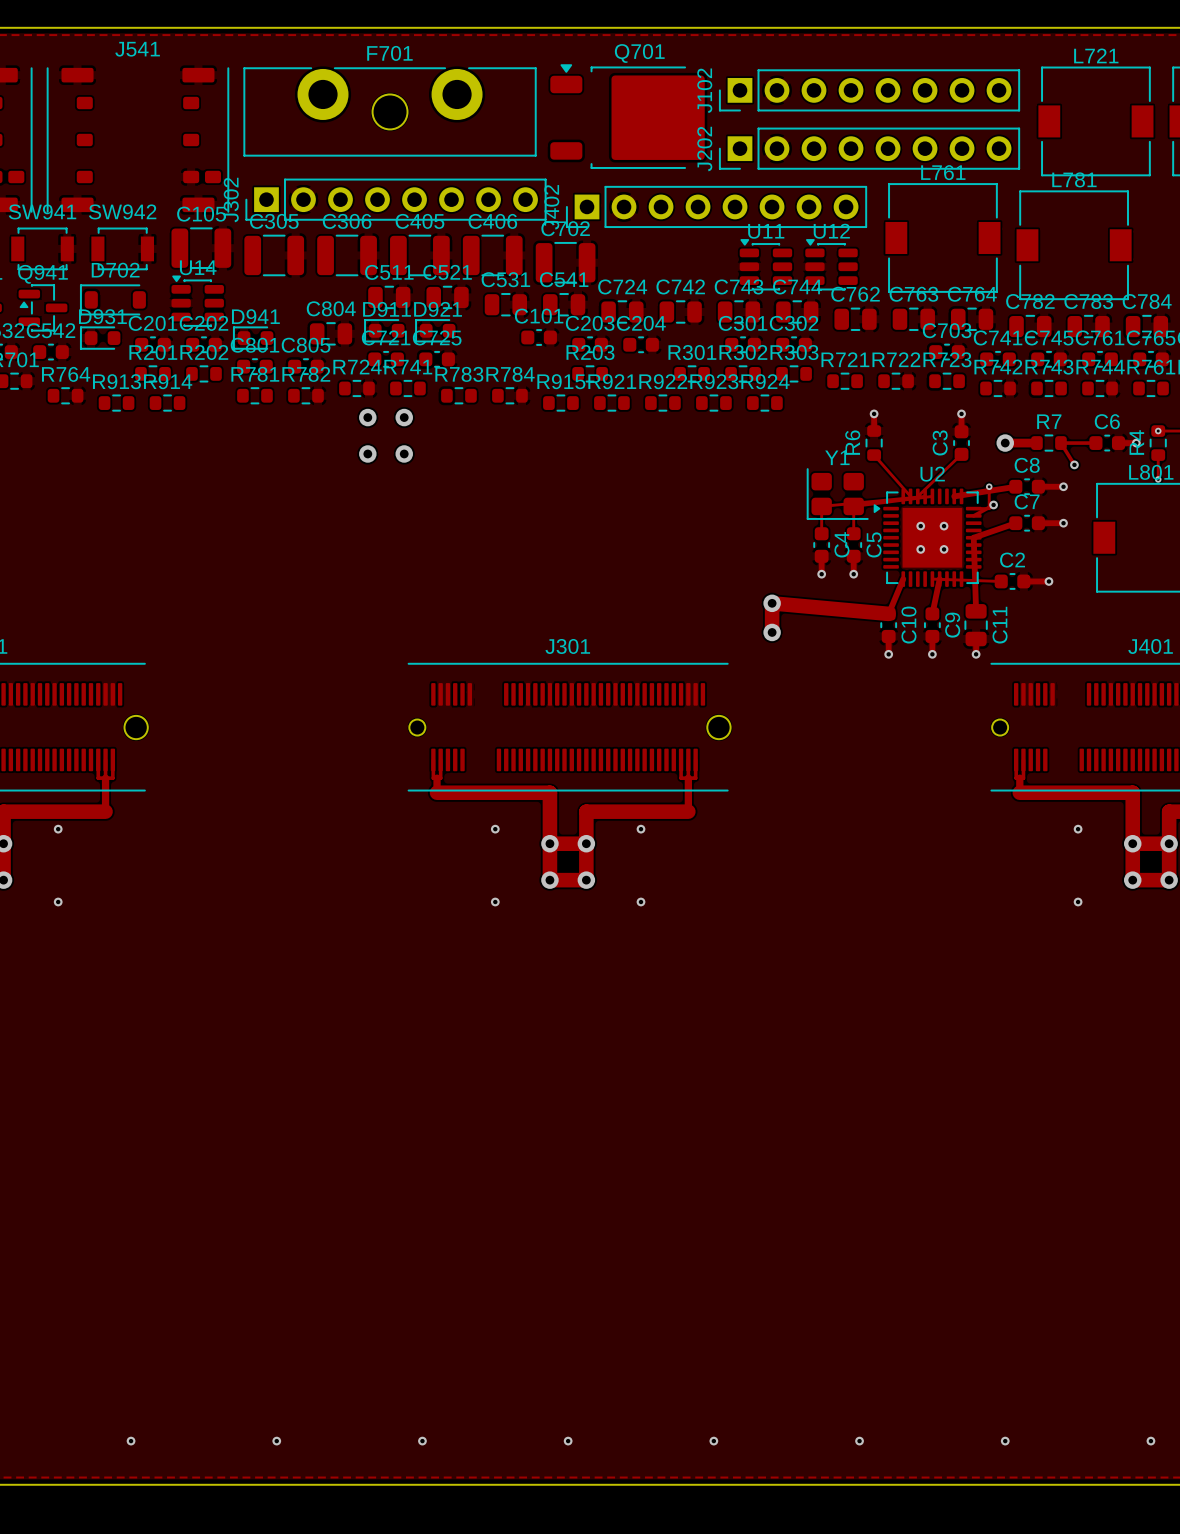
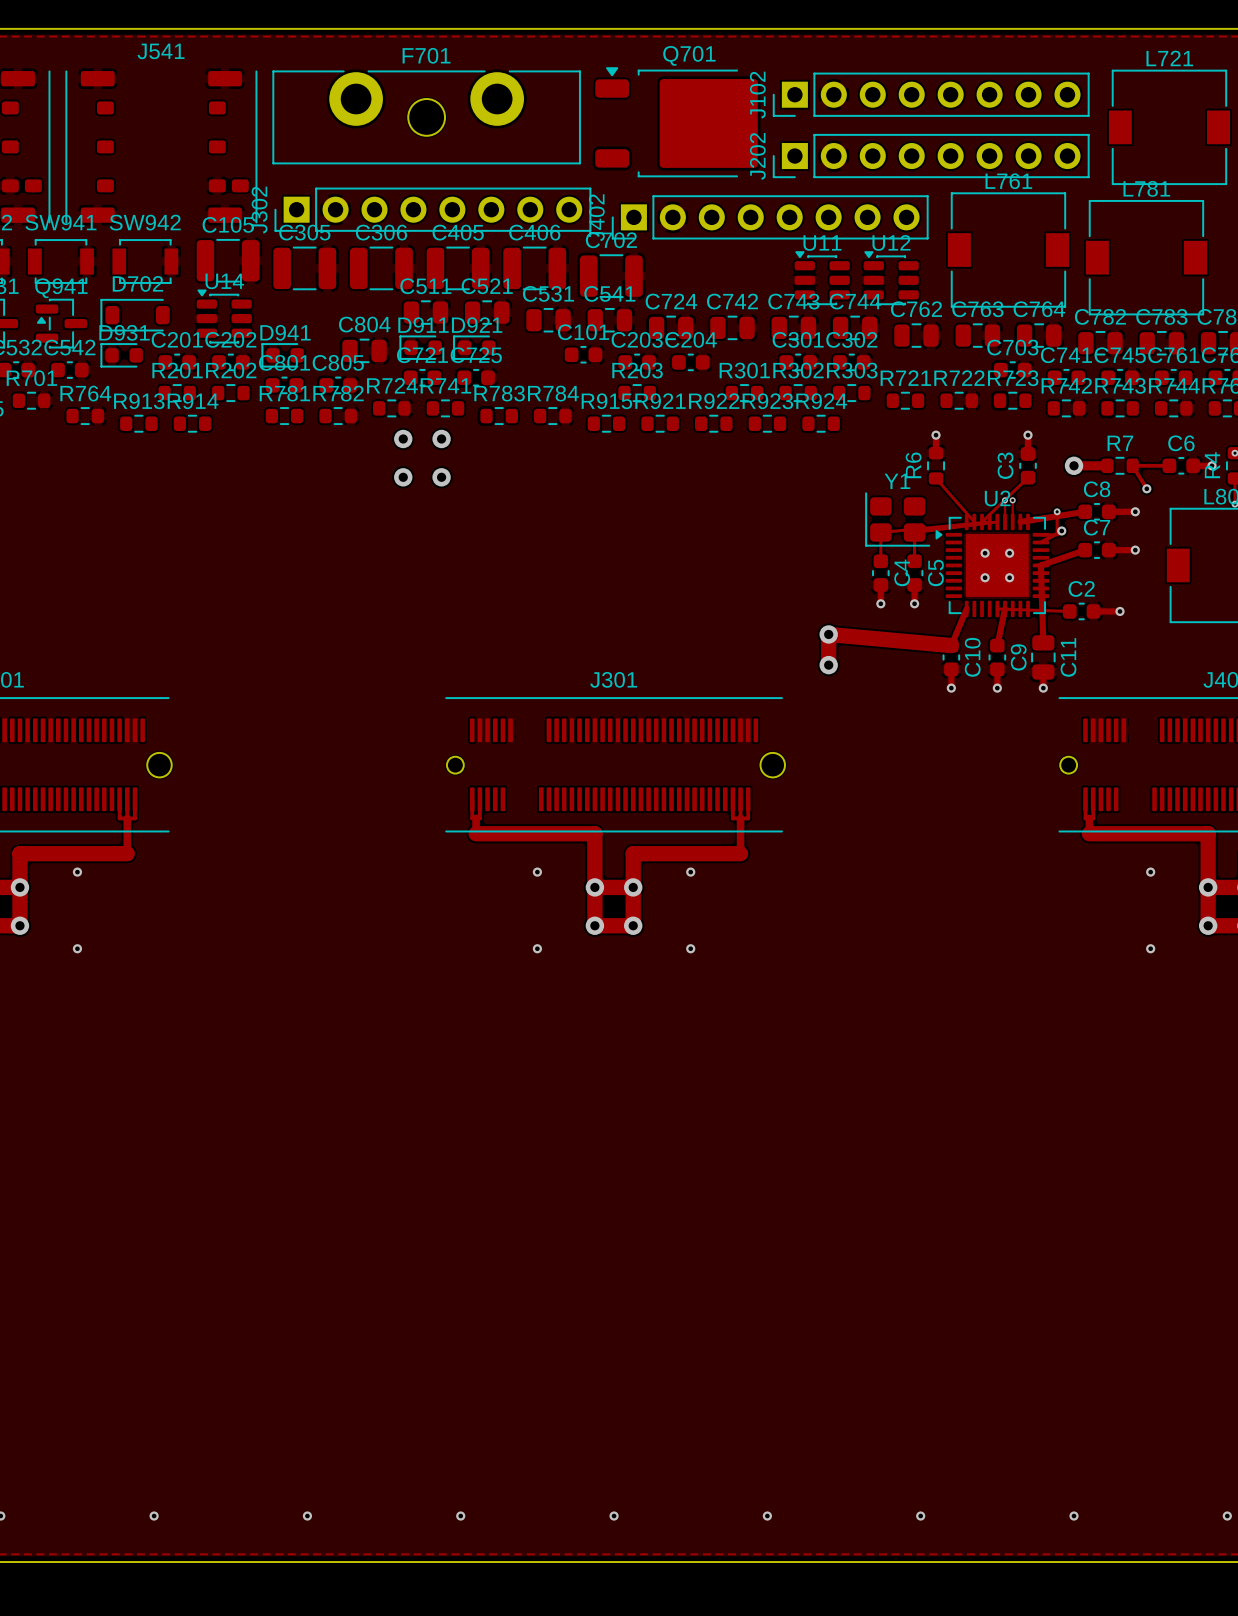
track: none -> (1005, 500) (1005, 521)
via: none -> (1005, 500)
track: none -> (1012, 500) (1012, 521)
via: none -> (1012, 500)

